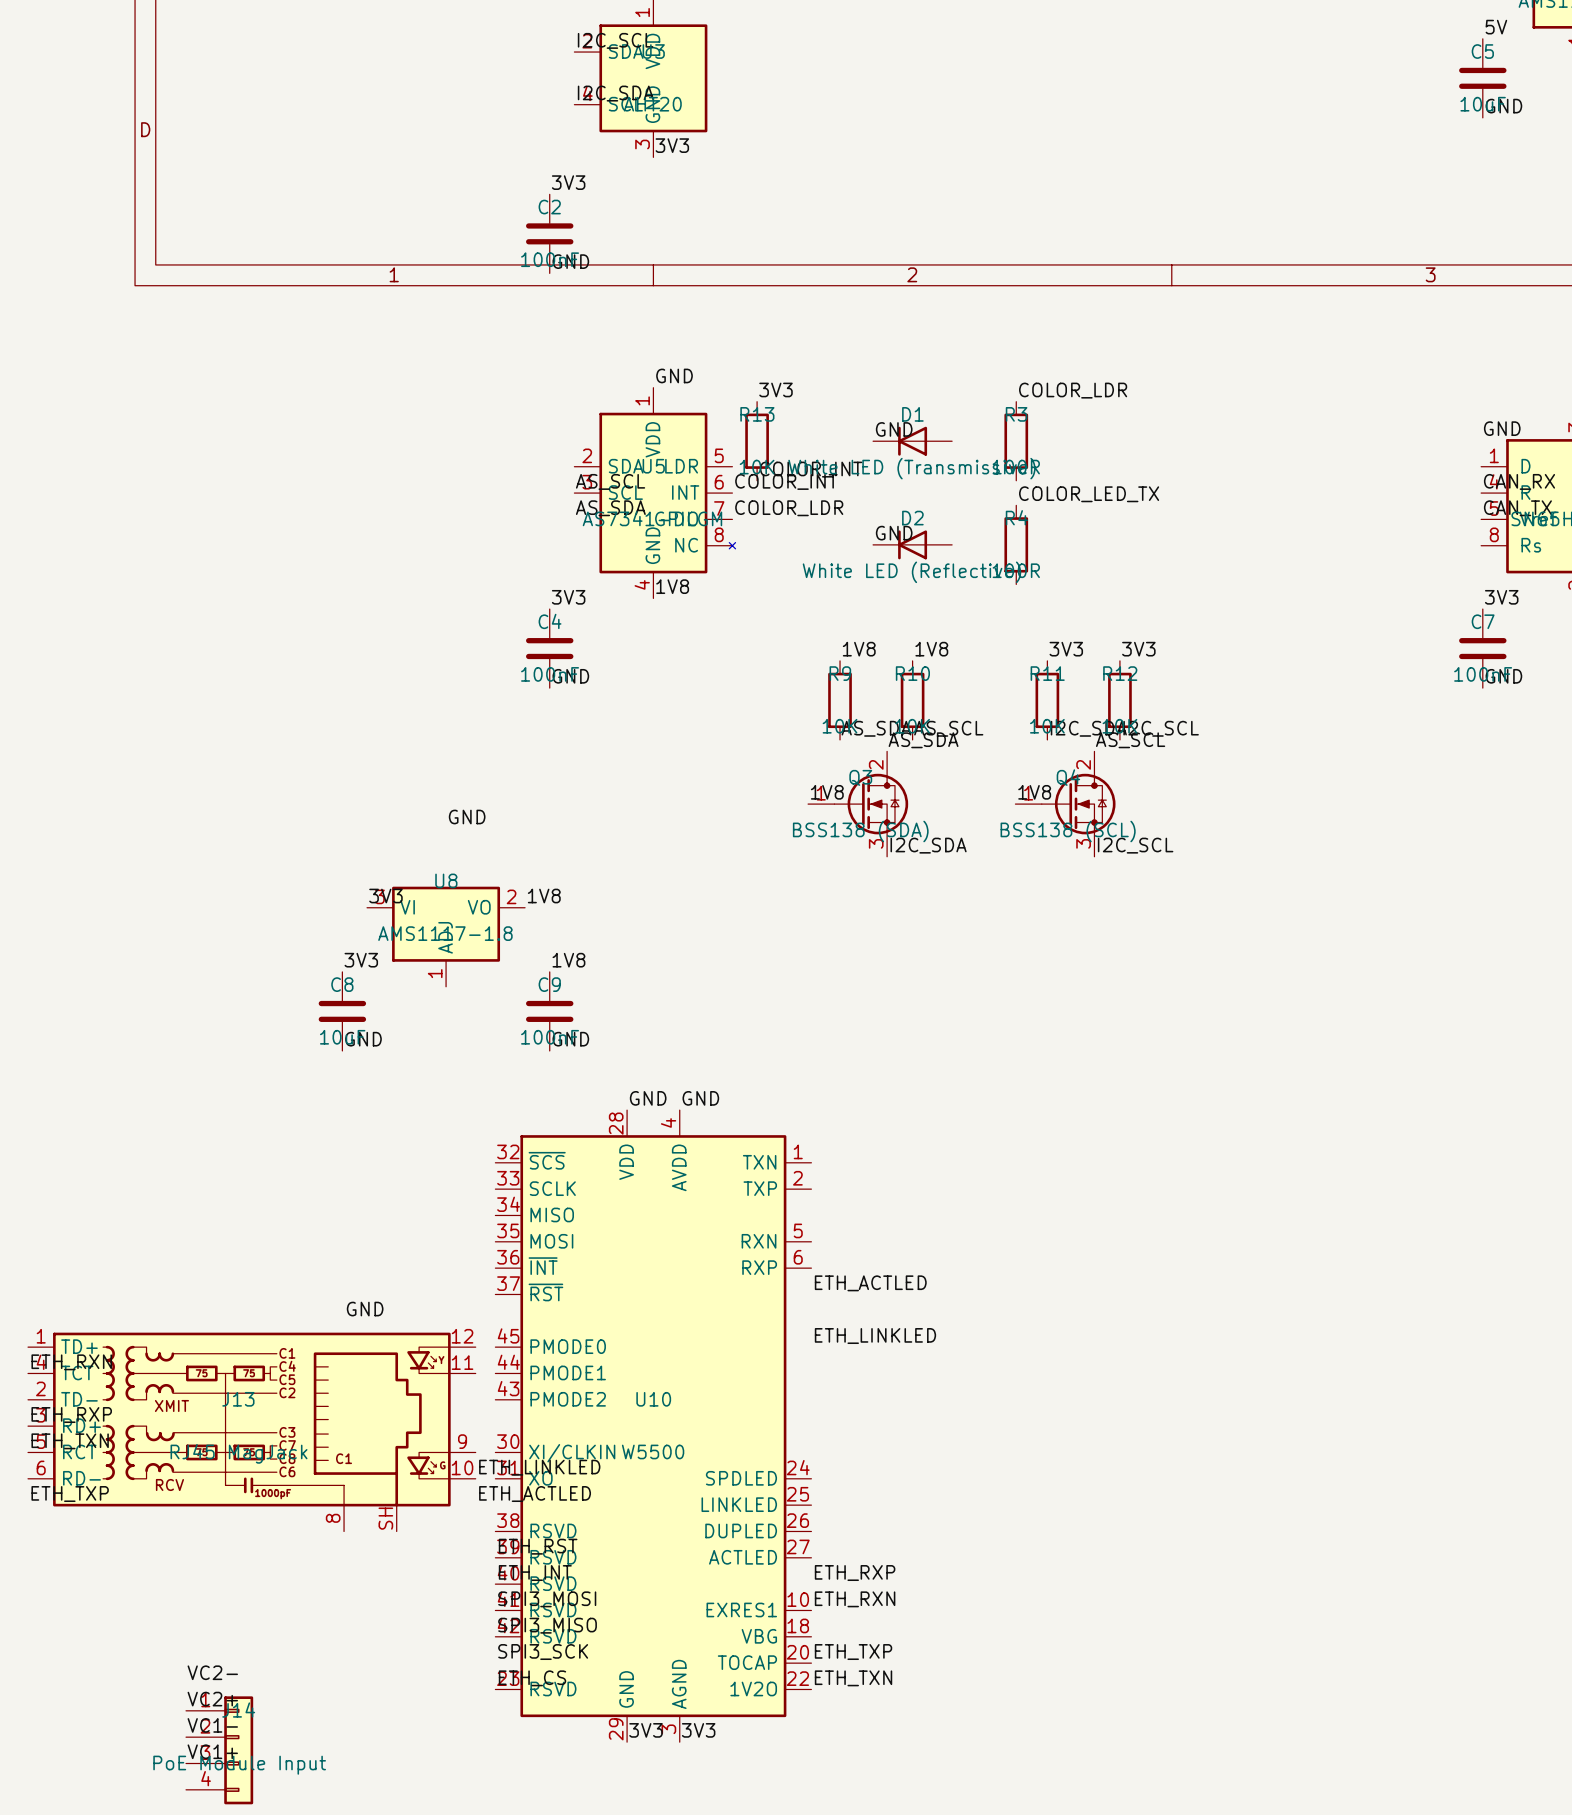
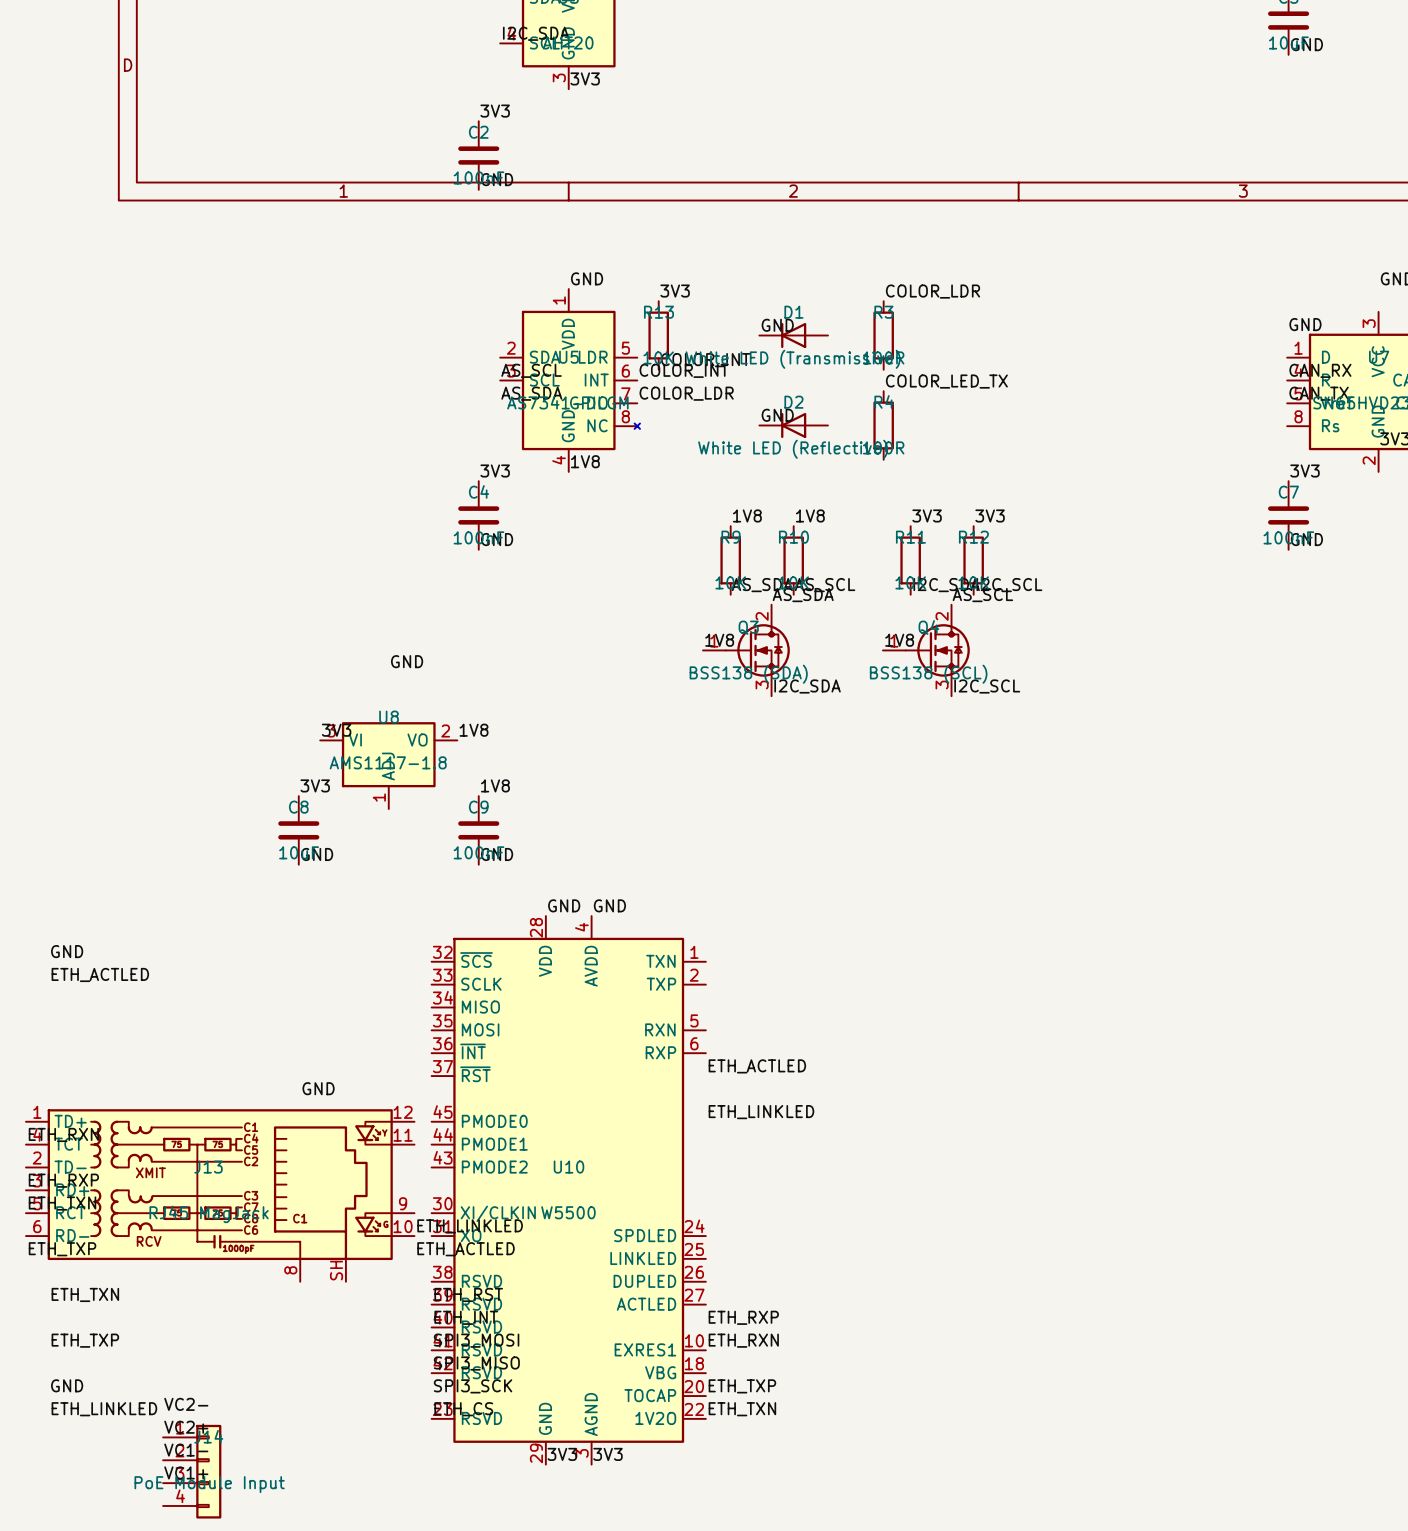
label: none -> GND (67, 951)
label: none -> ETH_ACTLED (100, 974)
label: none -> ETH_TXN (85, 1294)
label: none -> ETH_TXP (85, 1340)
label: none -> GND (67, 1385)
label: none -> ETH_LINKLED (104, 1409)

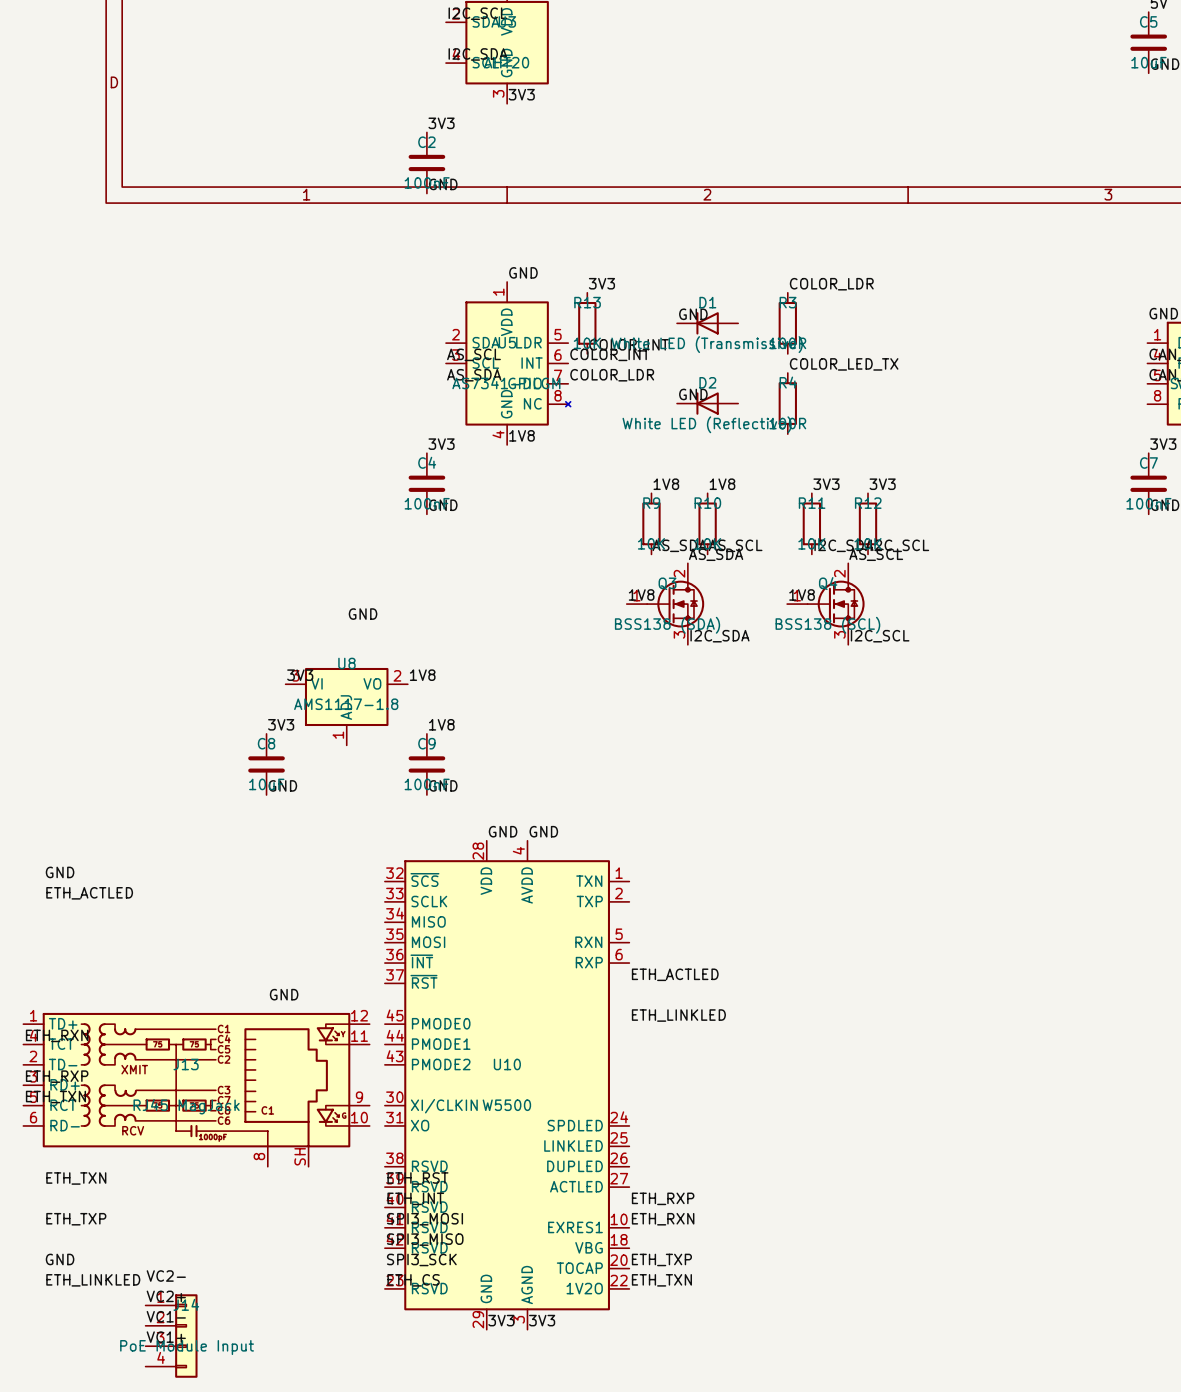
label: ETH_LINKLED (470, 1226) -> none
label: ETH_TXP (62, 1249) -> none
label: ETH_ACTLED (466, 1249) -> none

